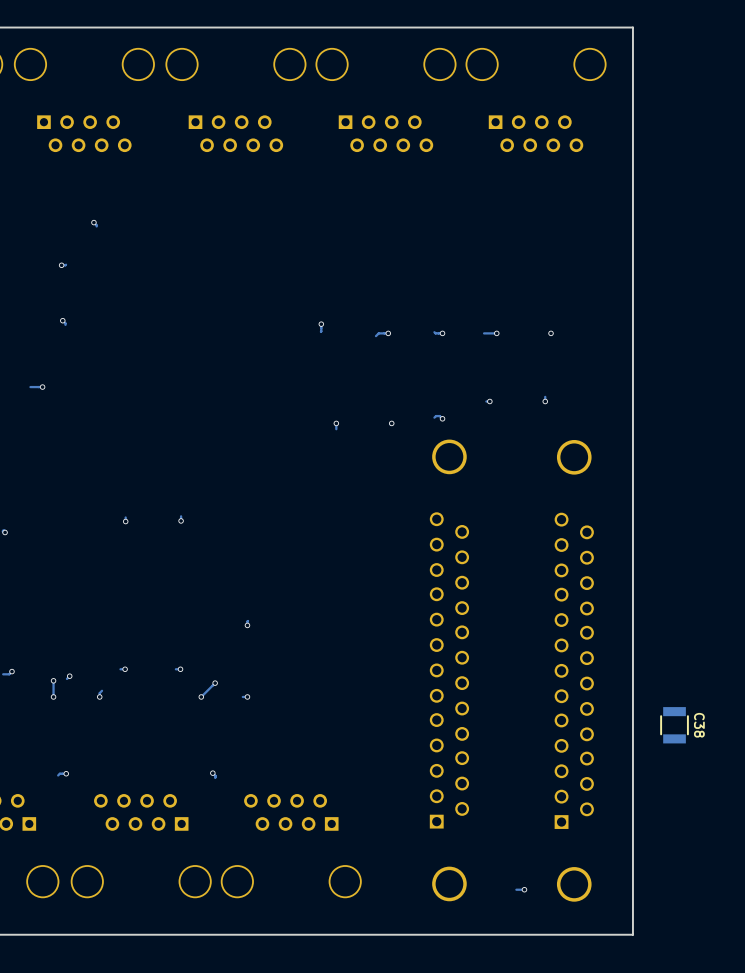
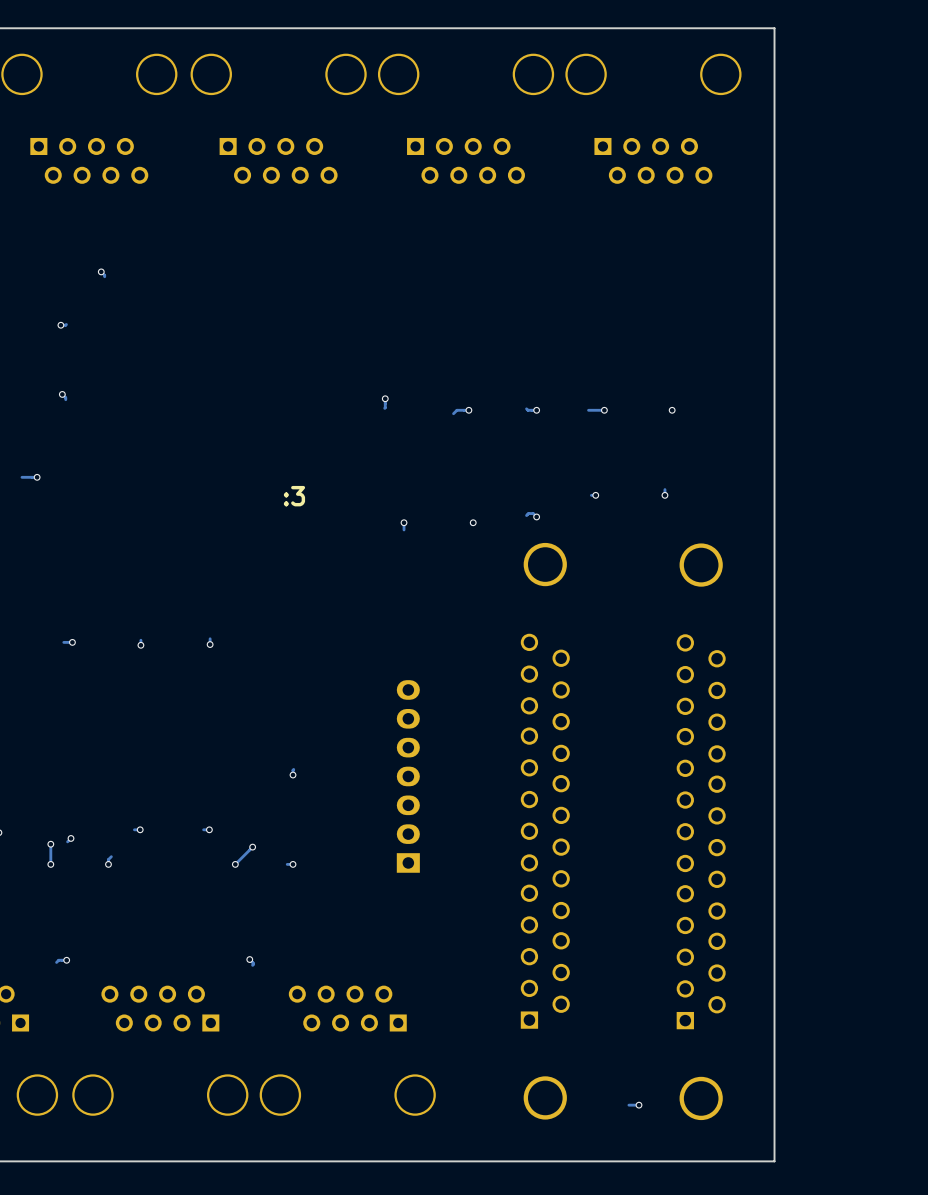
text: none -> :3 (294, 496)
track: none -> (72, 642) (63, 642)
via: none -> (72, 642)
part: none -> (408, 776)
C38: (674, 725) -> none

